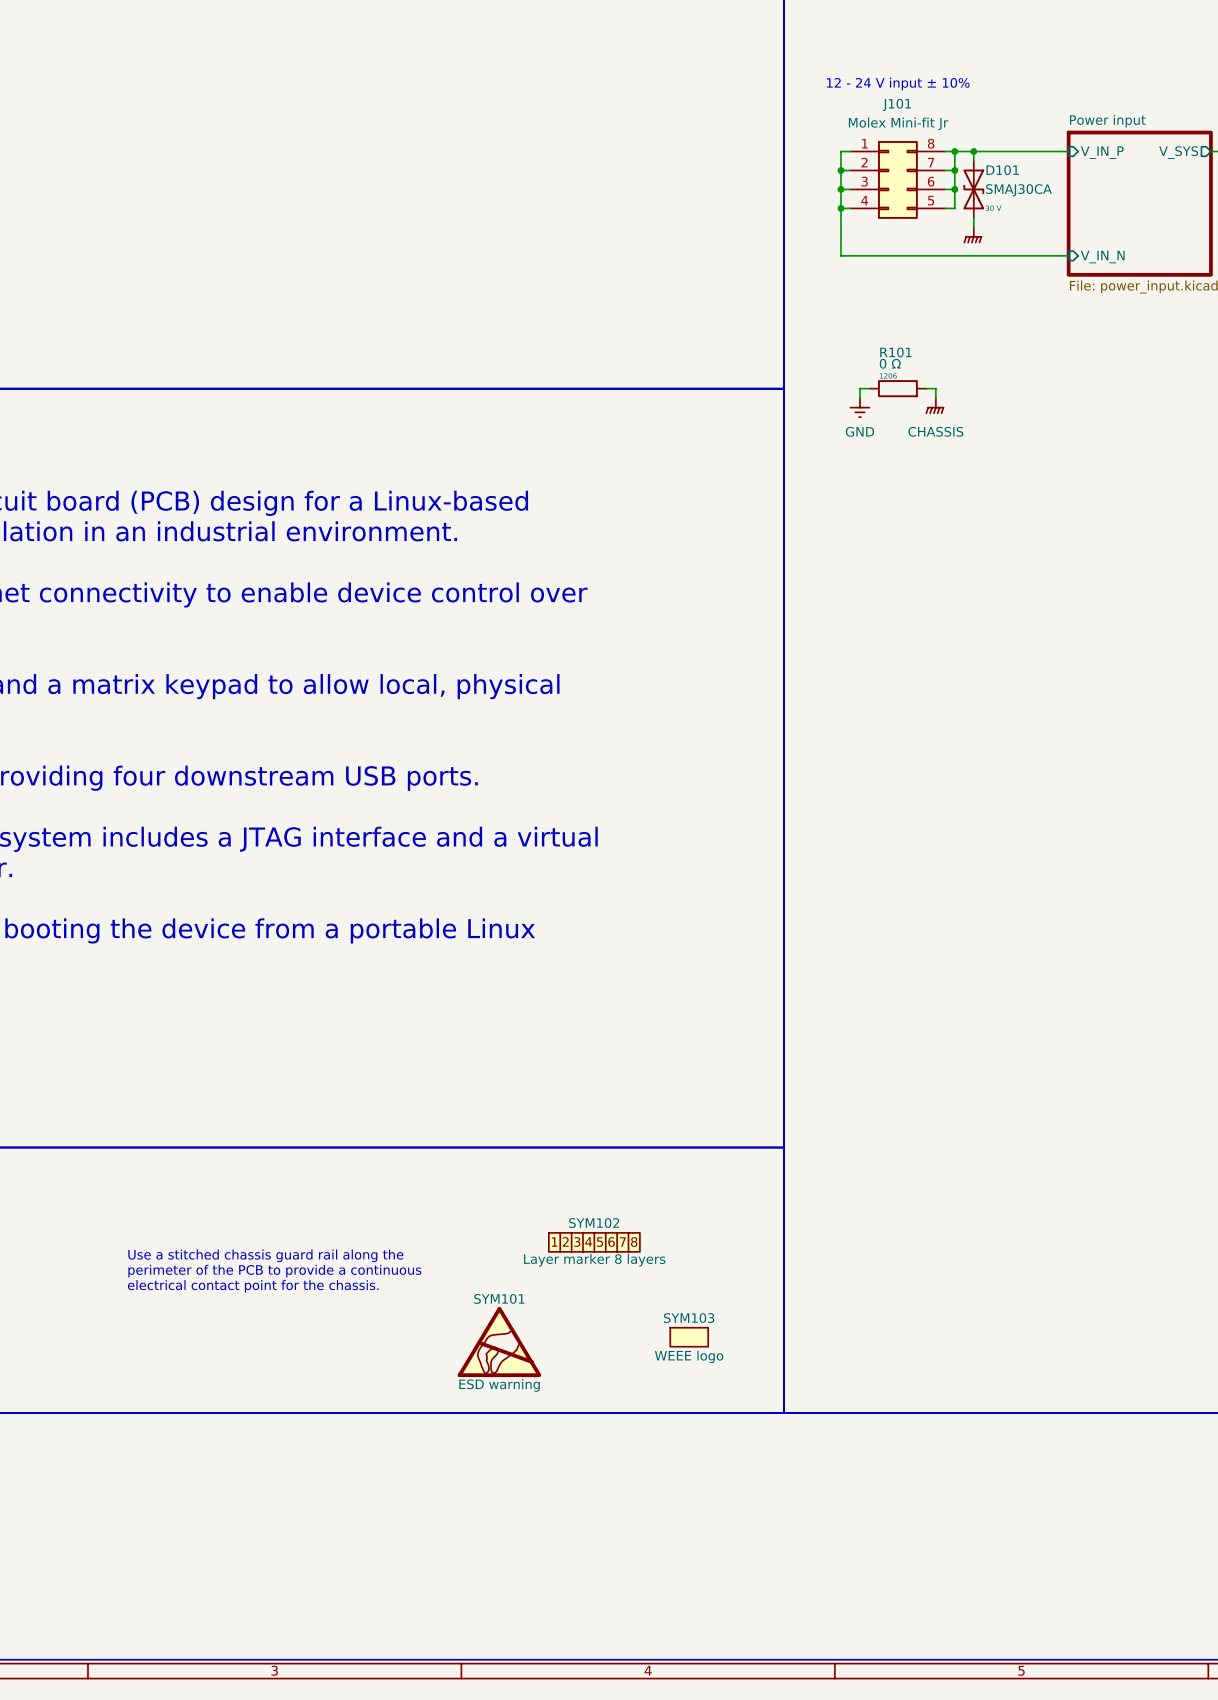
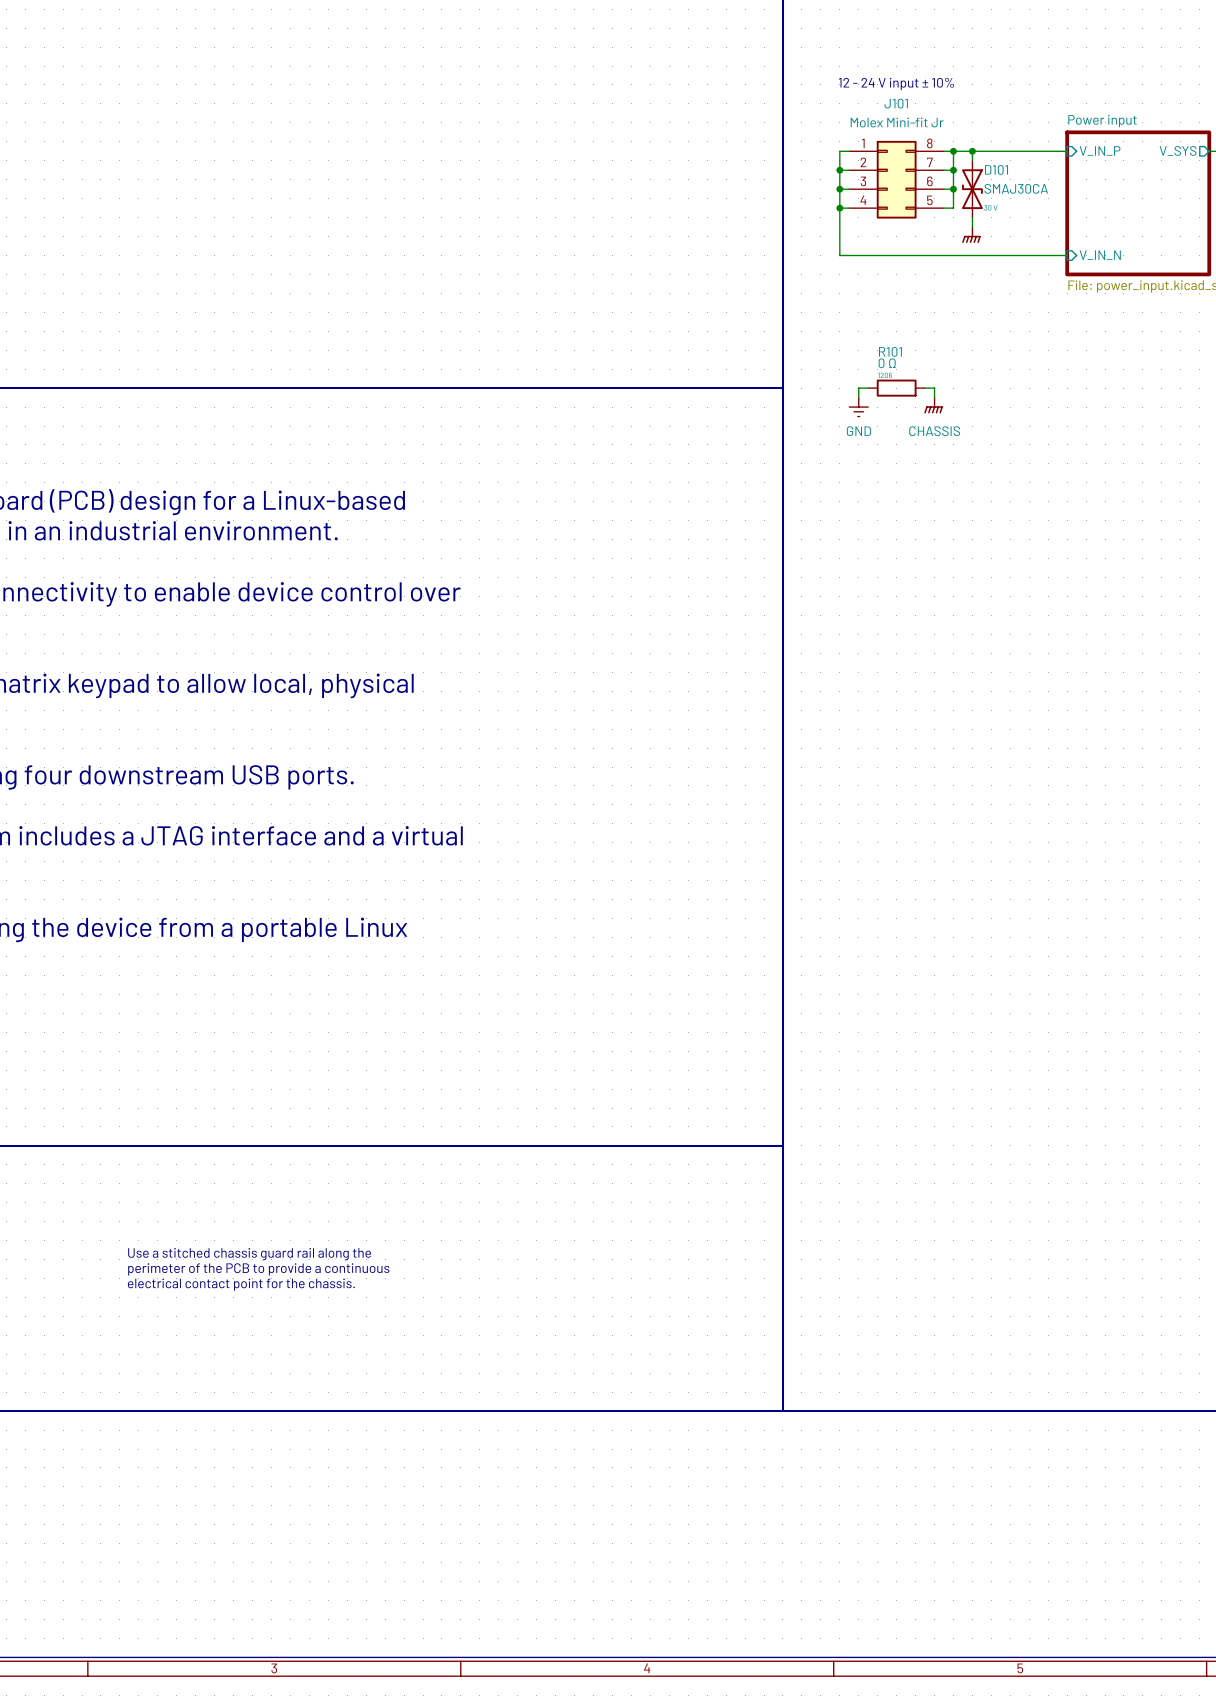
SYM102: Layer marker 8 layers (594, 1242) -> none
SYM103: WEEE logo (689, 1337) -> none
SYM101: ESD warning (499, 1341) -> none

